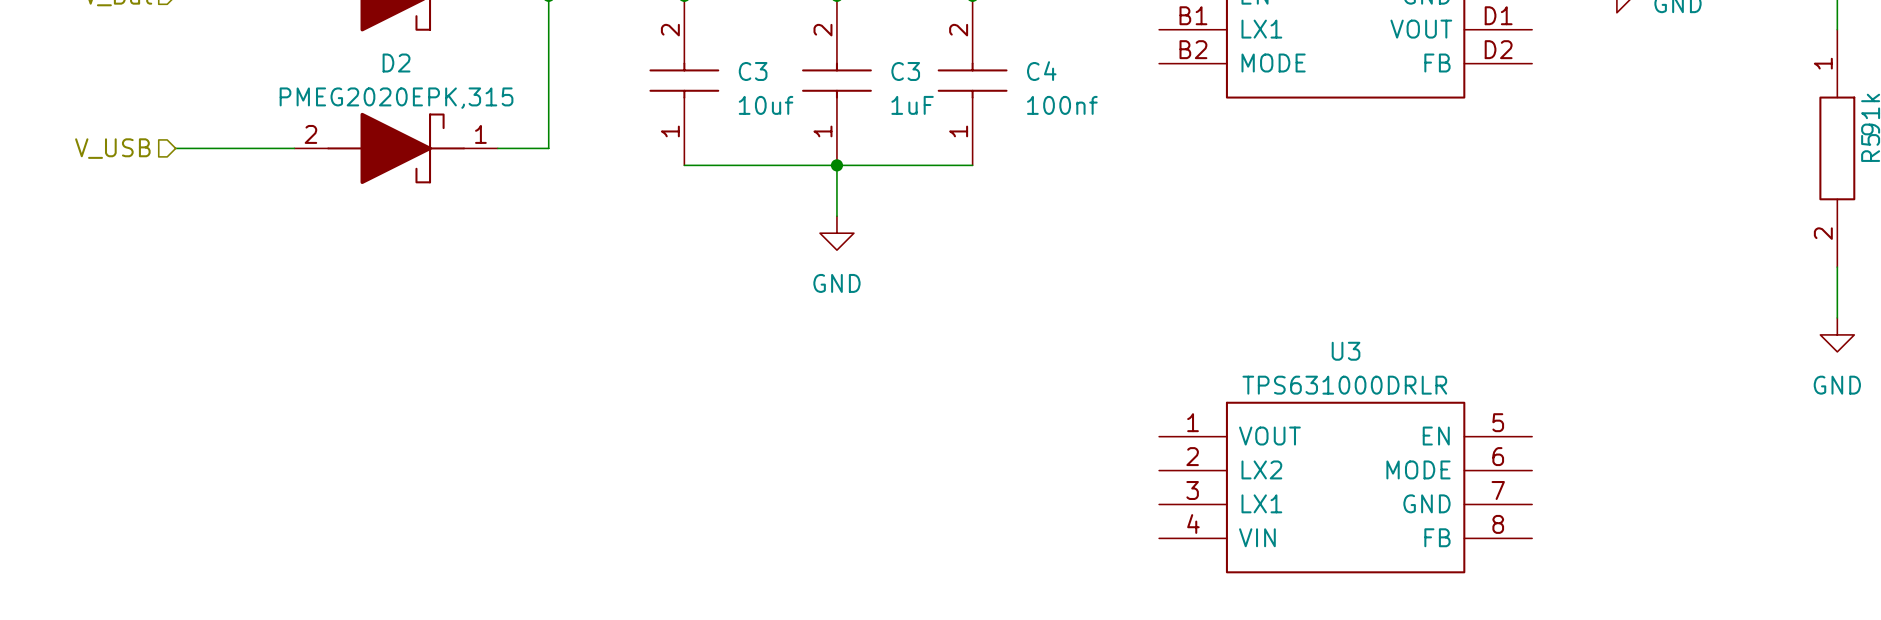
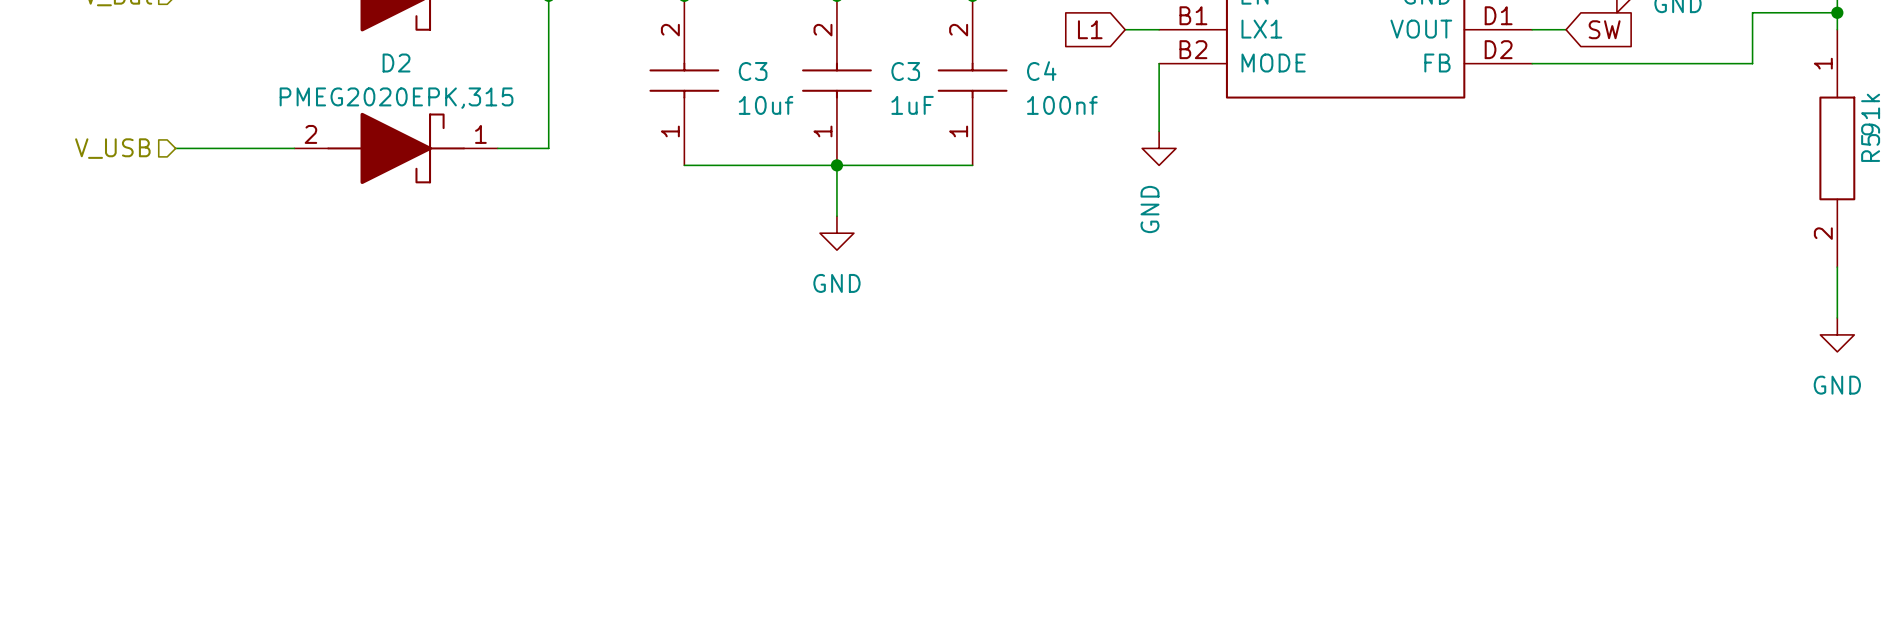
wire: none -> (1837, 12) (1752, 12) (1752, 63) (1532, 63)
junction: none -> (1837, 12)
global label: none -> L1 (1090, 29)
wire: none -> (1125, 29) (1159, 29)
wire: none -> (1532, 29) (1566, 29)
global label: none -> SW (1604, 29)
wire: none -> (1159, 63) (1159, 131)
power symbol: none -> GND (1159, 148)
U3: TPS631000DRLR (1345, 487) -> none

